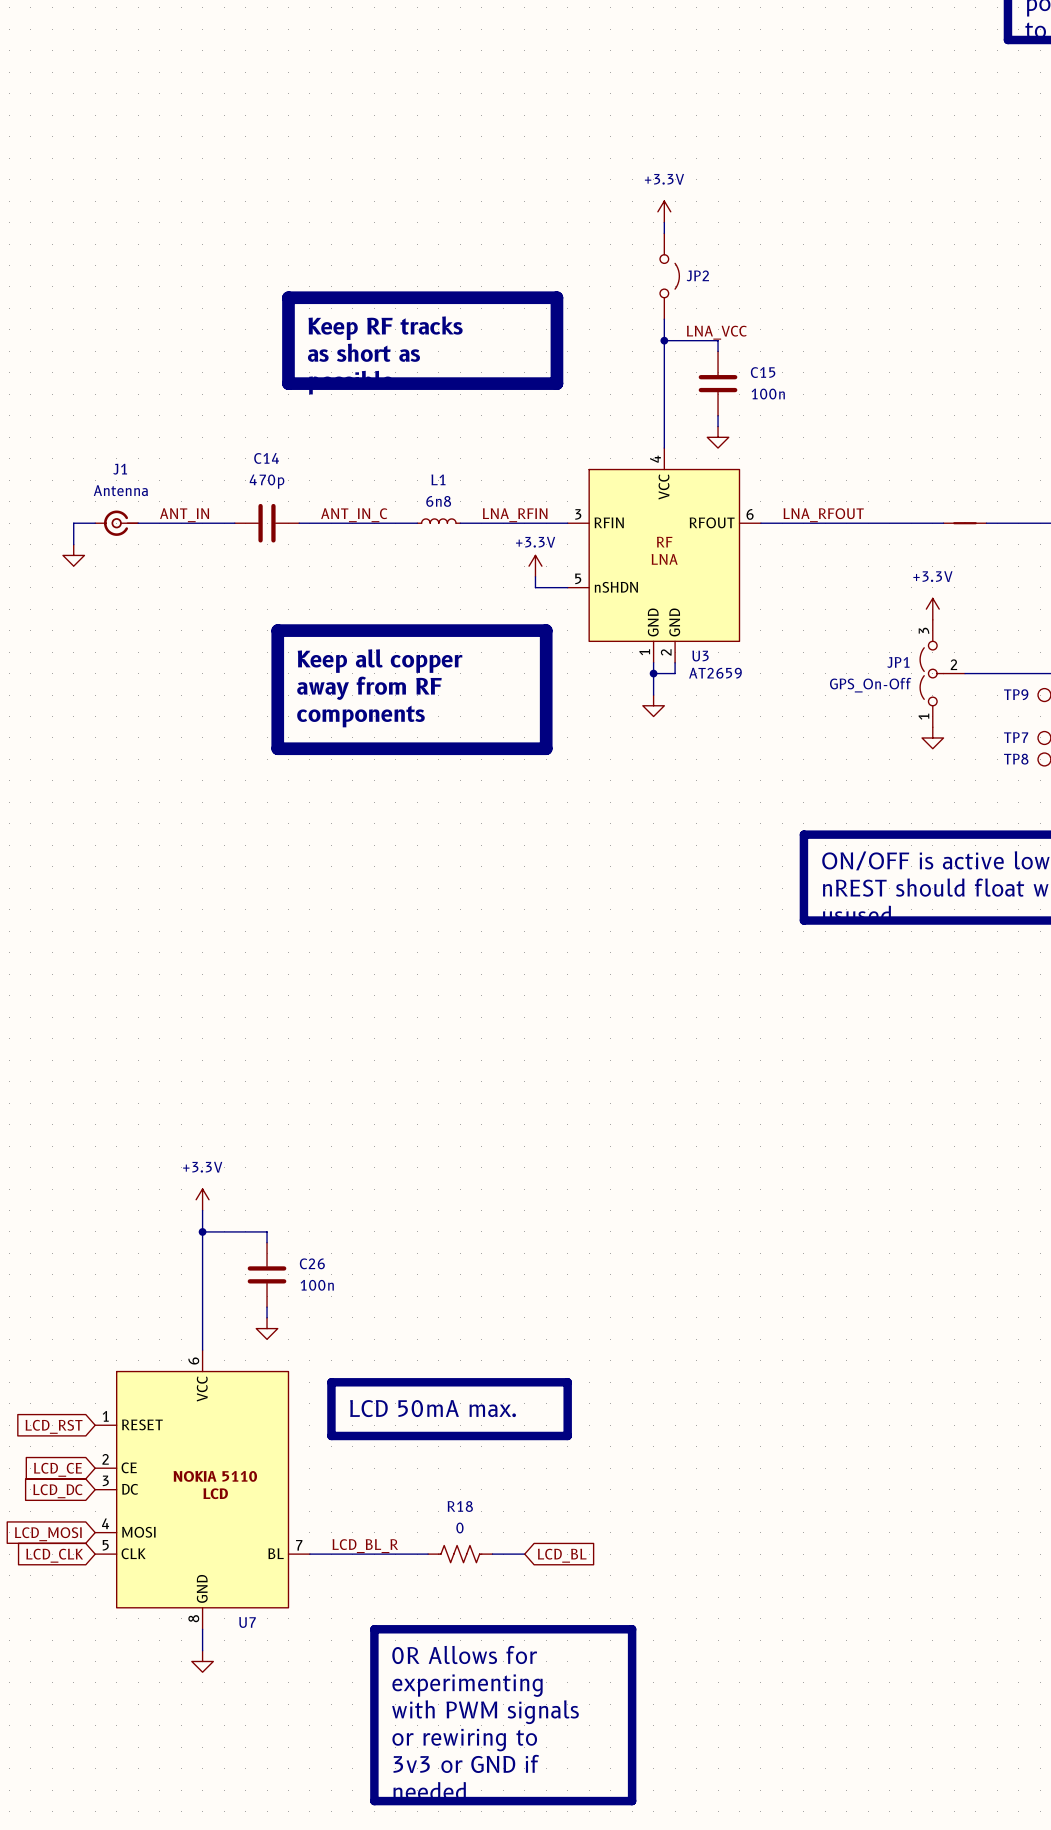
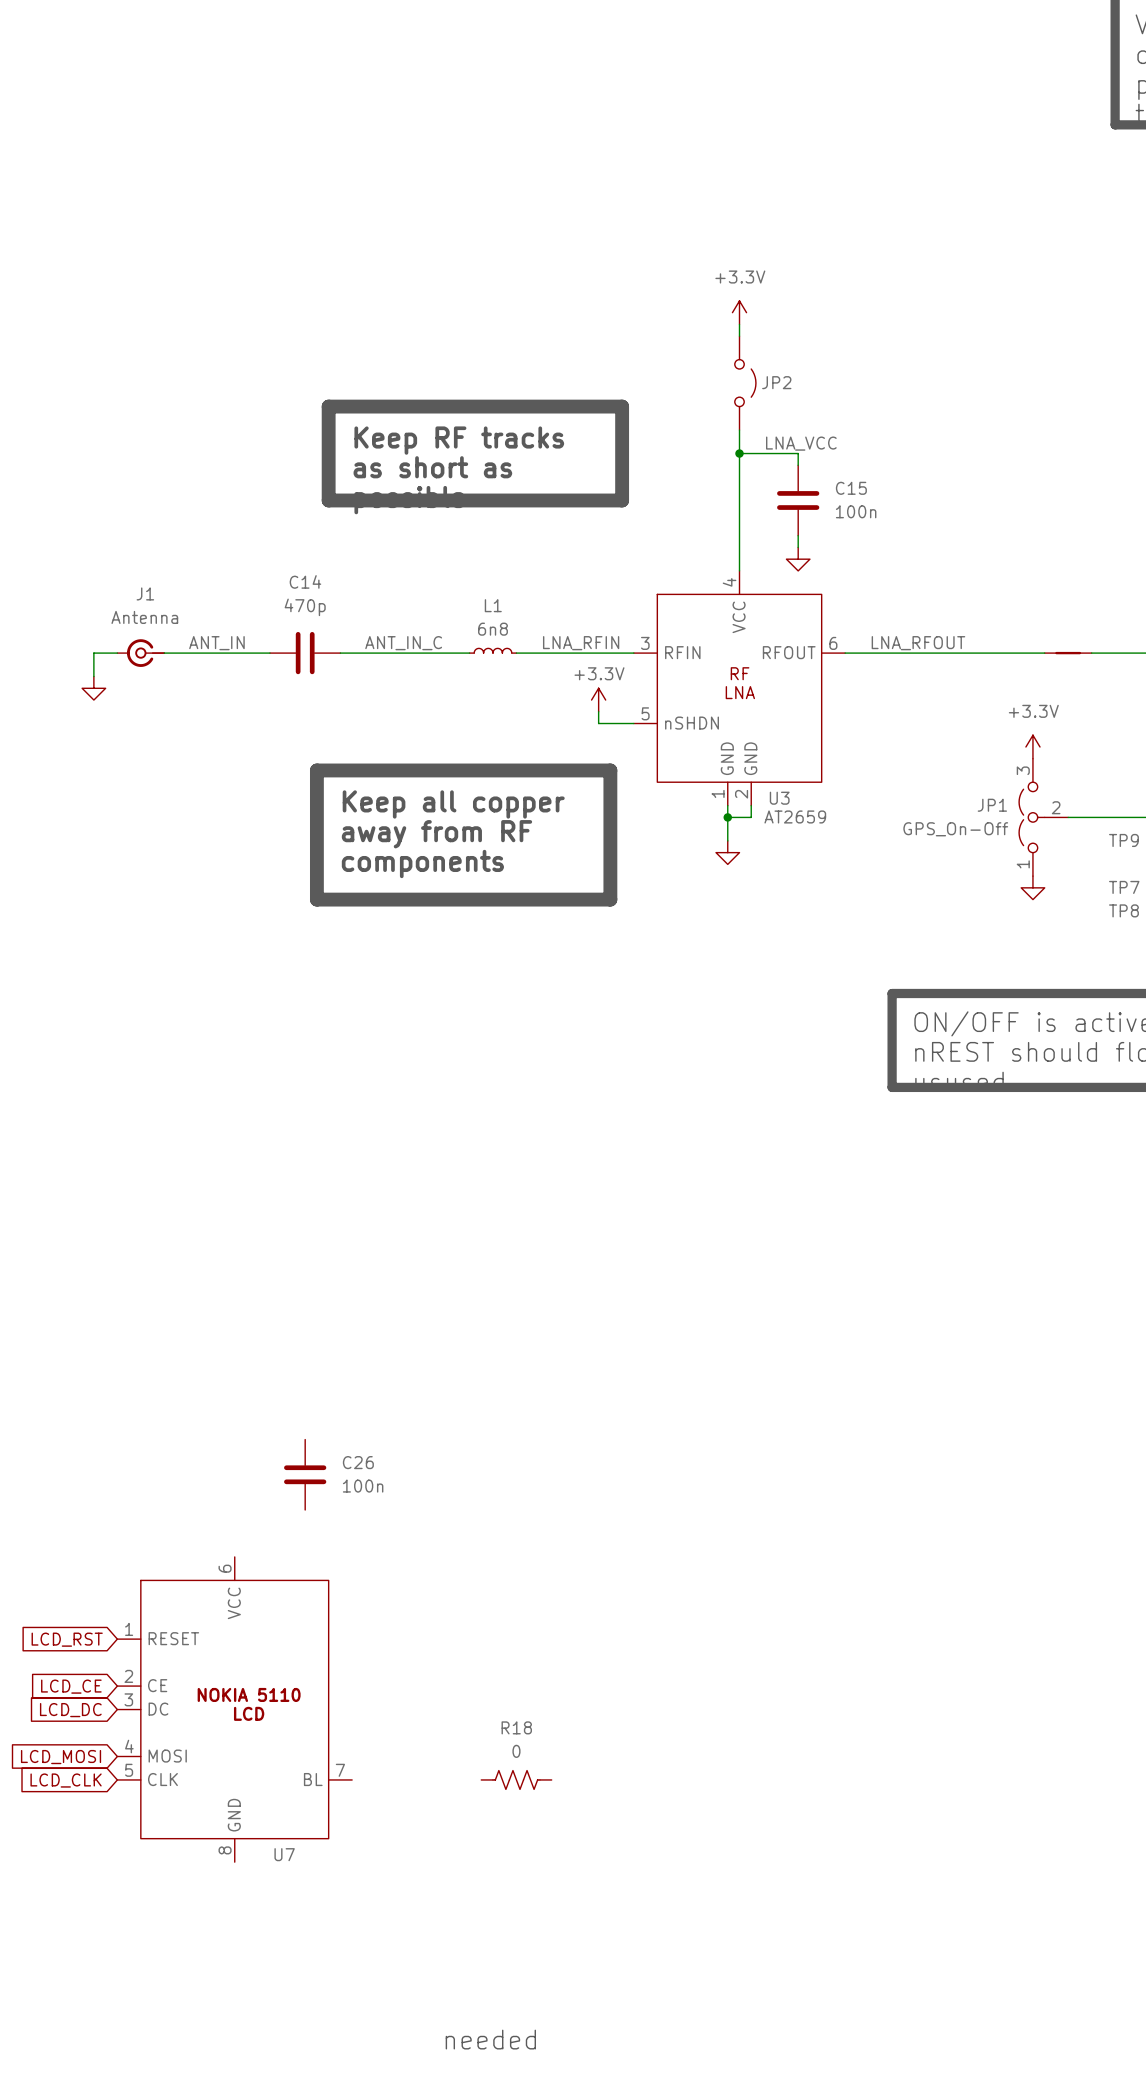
power symbol: +3.3V (202, 1199) -> none
wire: (202, 1210) (202, 1350) -> none
wire: (202, 1231) (267, 1231) (267, 1242) -> none
junction: (202, 1231) -> none
wire: (267, 1307) (267, 1317) -> none
power symbol: (267, 1328) -> none
line: (331, 1382) (567, 1382) (567, 1435) (331, 1435) (331, 1382) -> none
text: LCD 50mA max. (433, 1408) -> none
label: LCD_BL_R (365, 1546) -> none
wire: (309, 1554) (428, 1554) -> none
wire: (492, 1554) (524, 1554) -> none
global label: LCD_BL (562, 1555) -> none
wire: (202, 1629) (202, 1650) -> none
line: (374, 1629) (632, 1629) (632, 1801) (374, 1801) (374, 1629) -> none
text: 0R Allows for (464, 1654) -> none
power symbol: (202, 1661) -> none
text: experimenting (467, 1685) -> none
text: with PWM signals (485, 1712) -> none
text: or rewiring to (464, 1740) -> none
text: 3v3 or GND if (466, 1763) -> none

